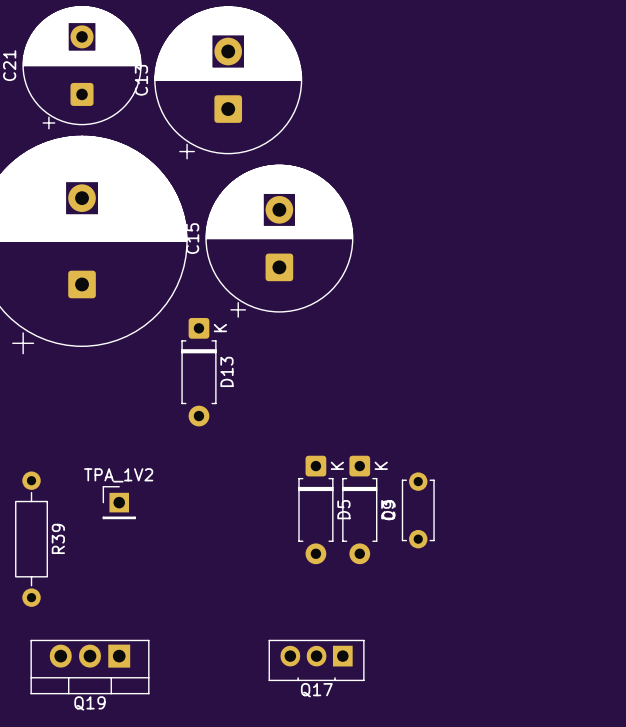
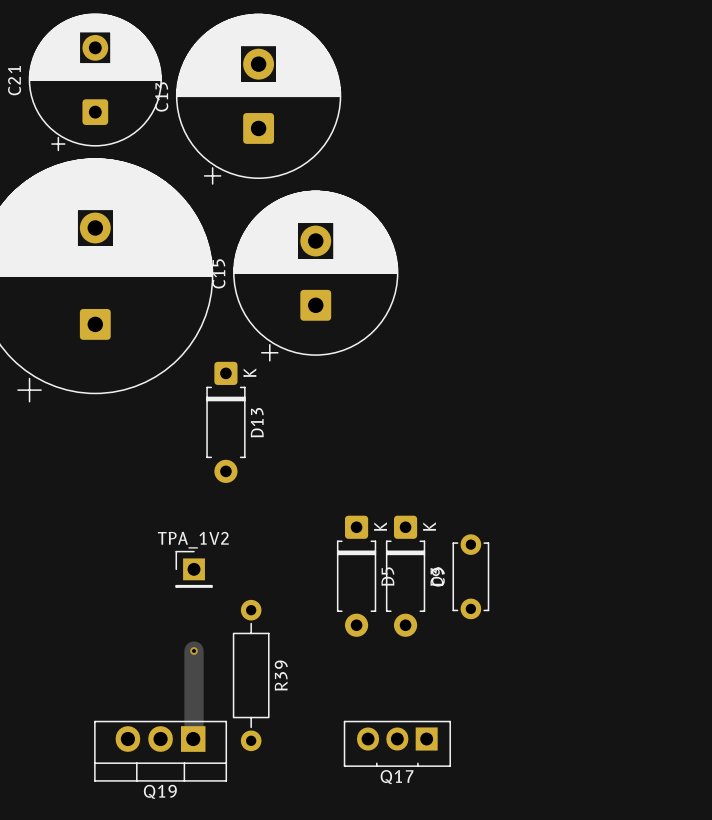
TPA_1V2 position: (119, 502) -> (194, 569)
R39 position: (31, 539) -> (251, 675)
track: none -> (194, 651) (193, 739)
via: none -> (194, 651)
Q17 position: (316, 660) -> (397, 743)
Q19 position: (89, 667) -> (160, 751)

